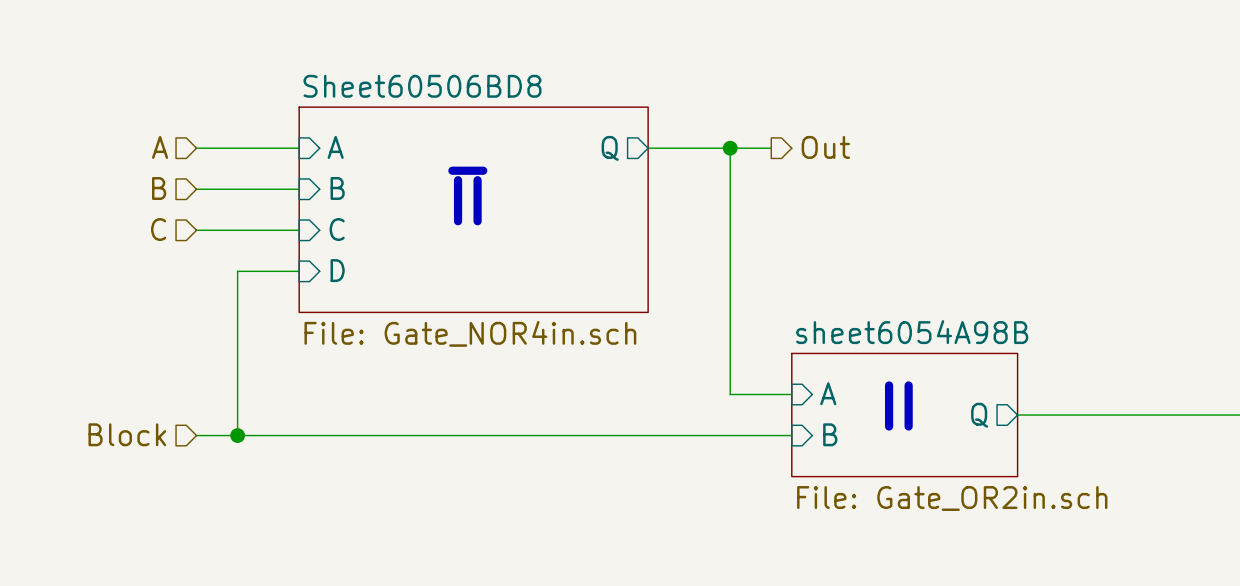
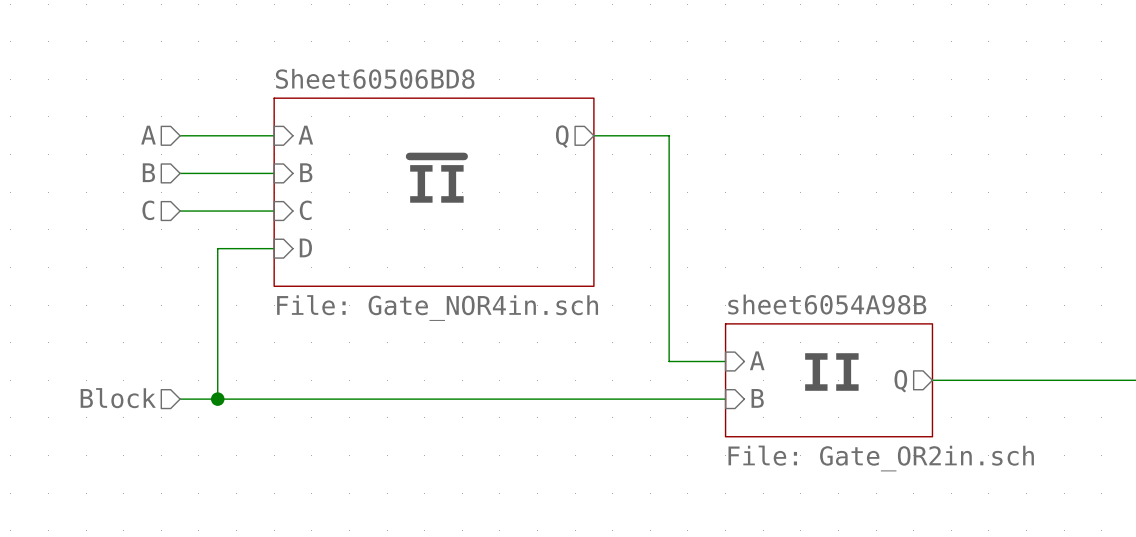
hierarchical label: Out (825, 147) -> none
wire: (730, 148) (771, 148) -> none
junction: (730, 148) -> none

